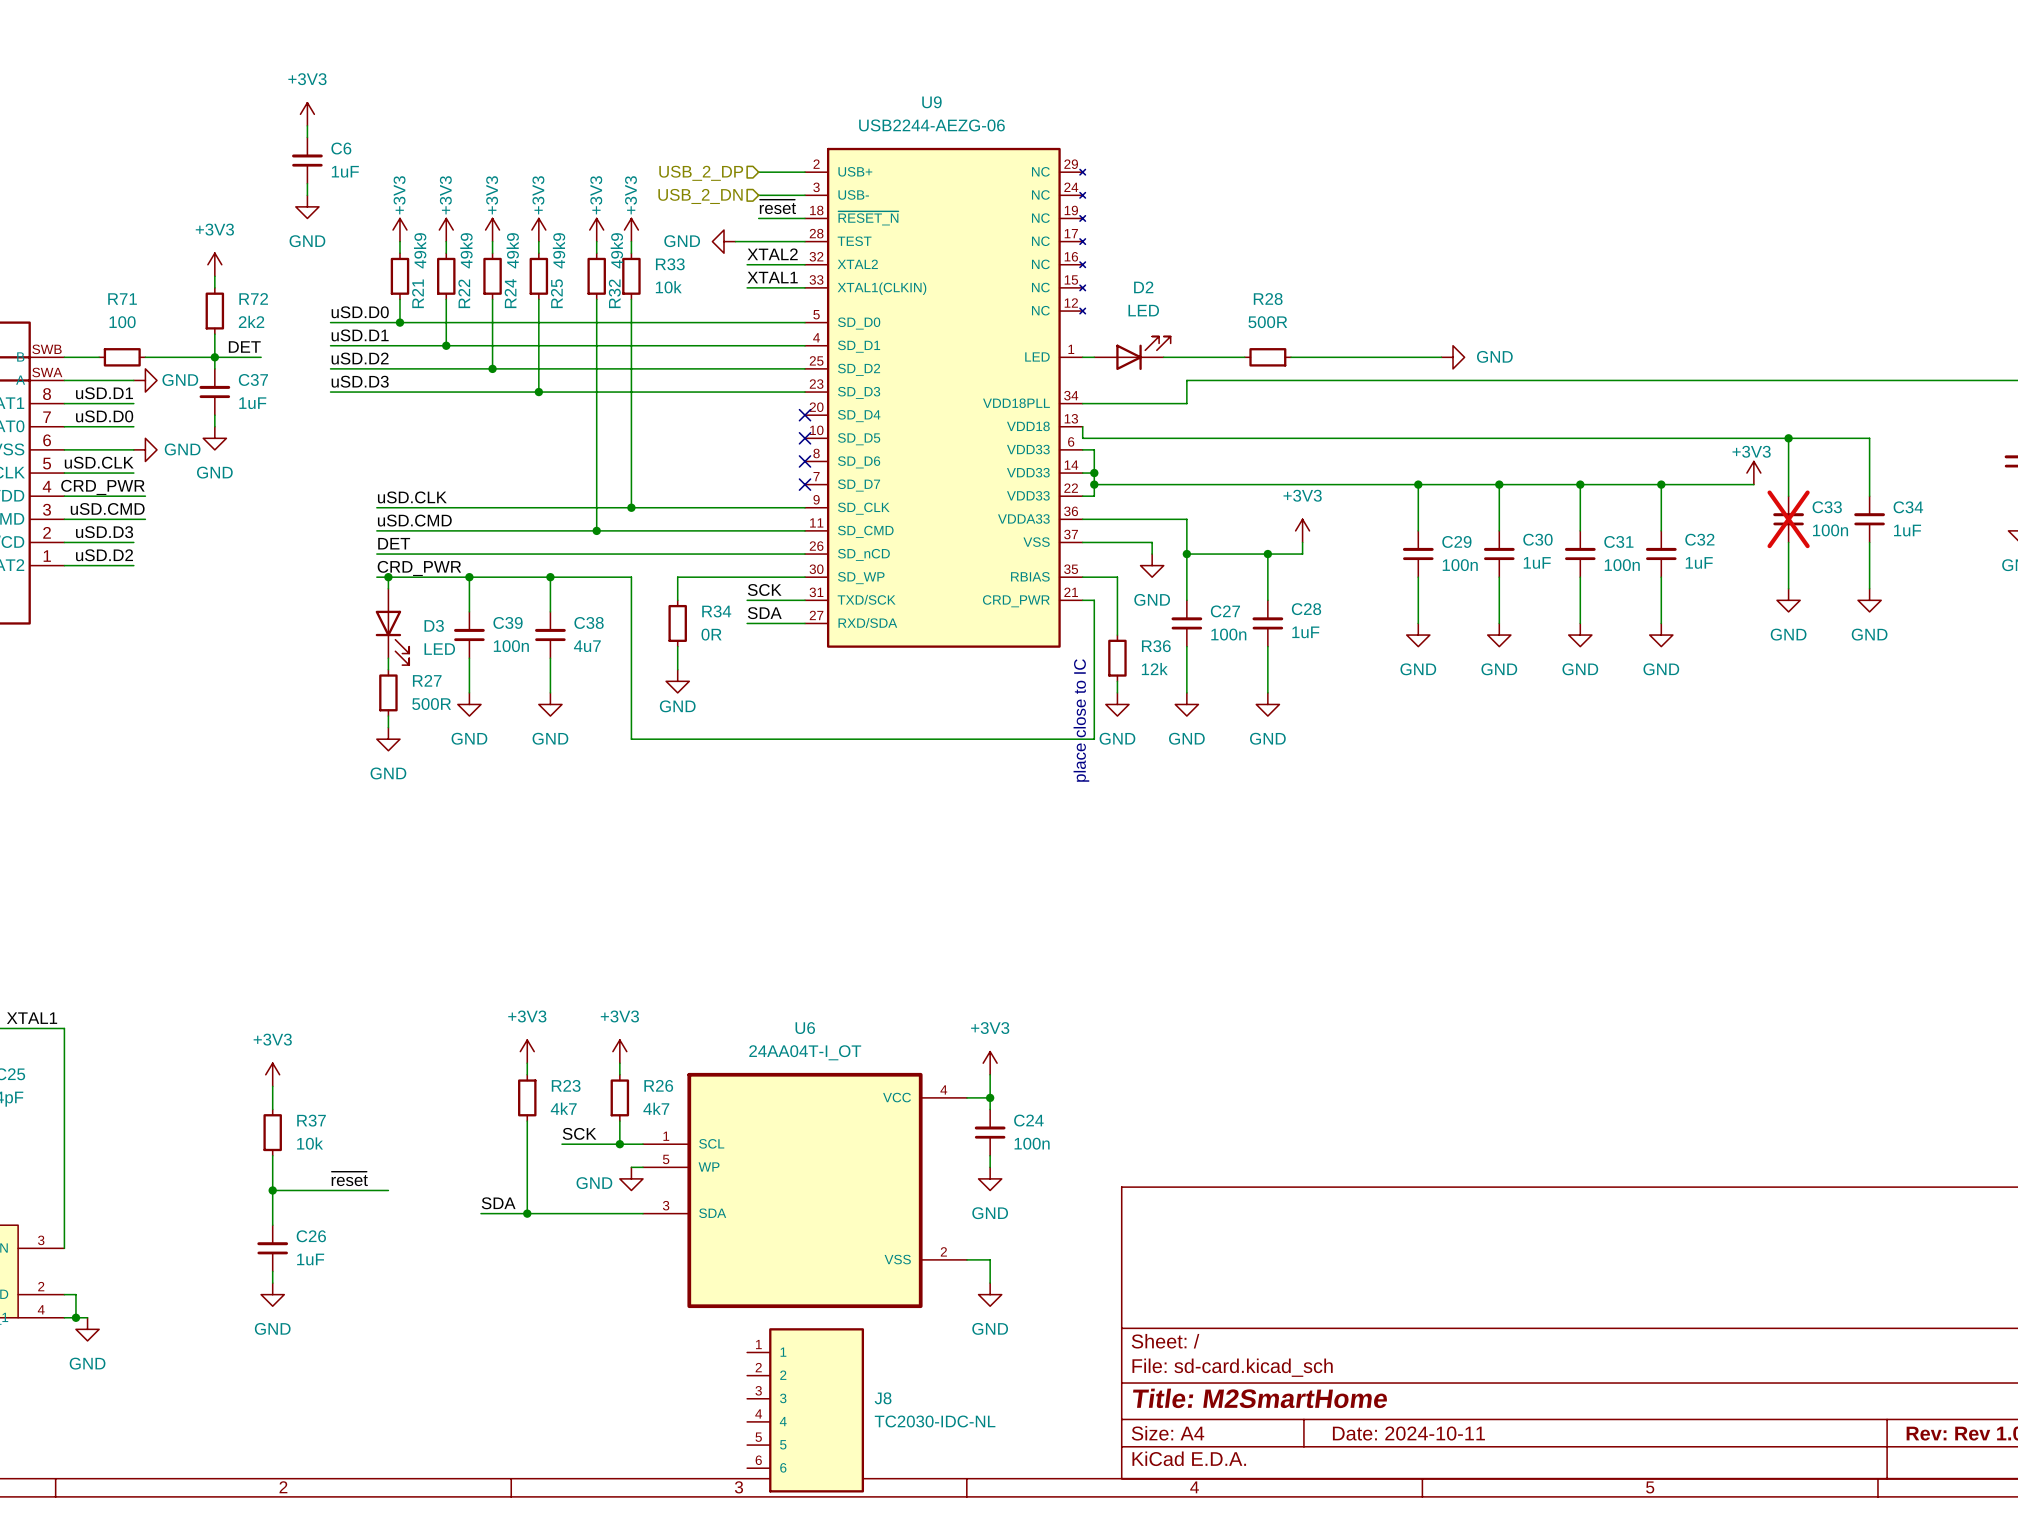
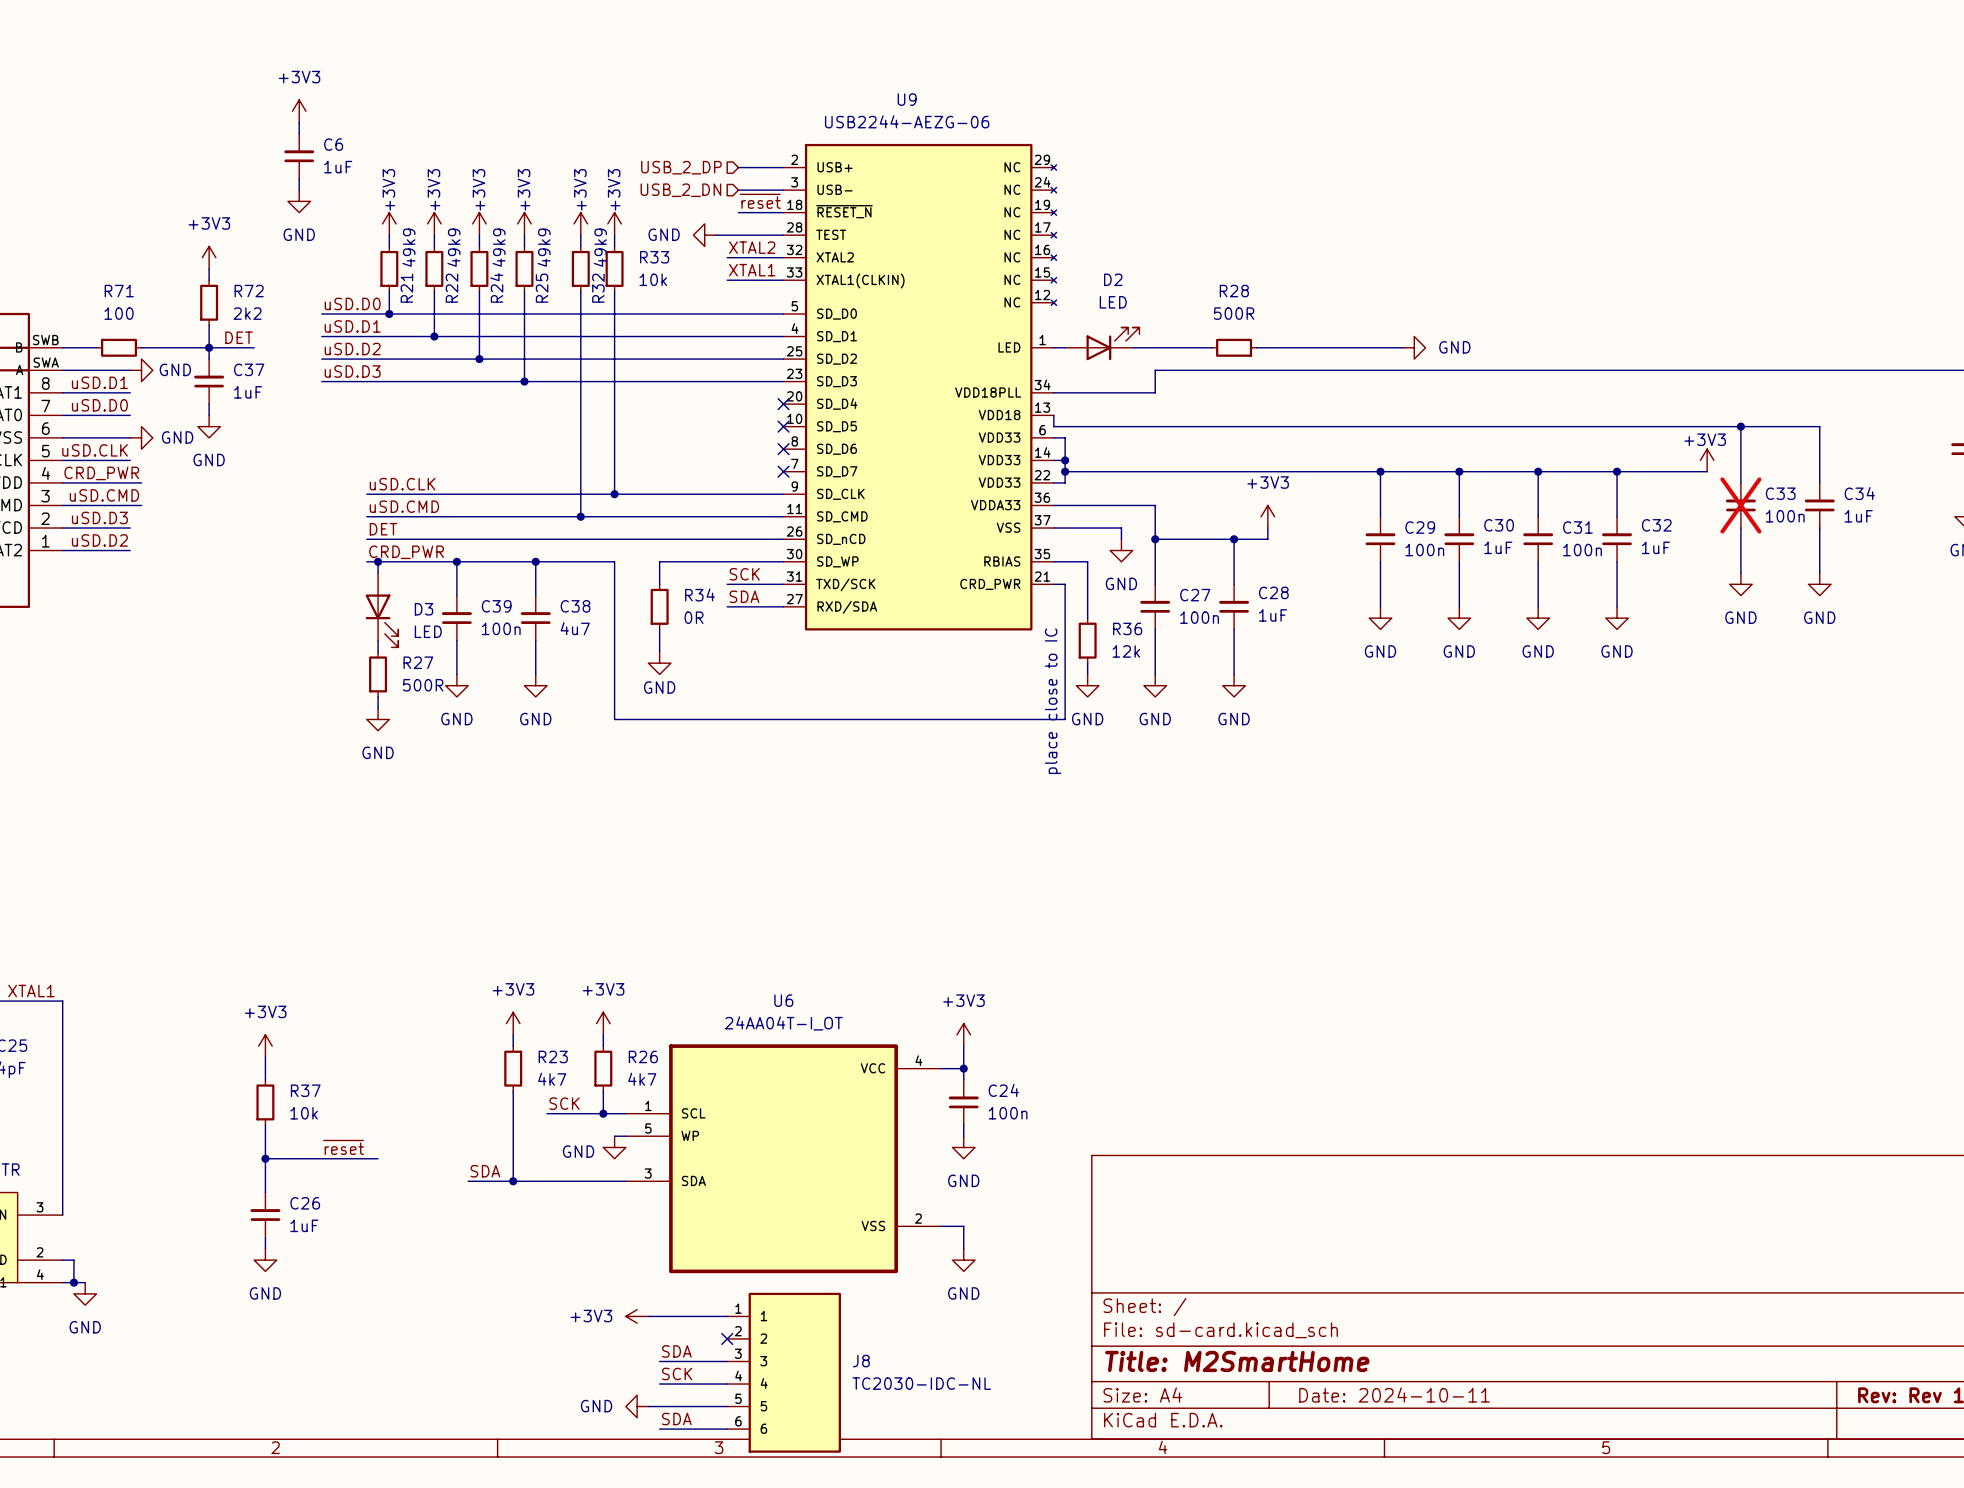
power symbol: none -> +3V3 (637, 1316)
wire: none -> (648, 1316) (727, 1316)
no-connect mark: none -> (727, 1338)
label: none -> SDA (676, 1351)
wire: none -> (659, 1361) (727, 1361)
label: none -> SCK (677, 1373)
wire: none -> (659, 1384) (727, 1384)
power symbol: none -> GND (637, 1406)
wire: none -> (648, 1406) (727, 1406)
label: none -> SDA (676, 1419)
wire: none -> (659, 1429) (727, 1429)

